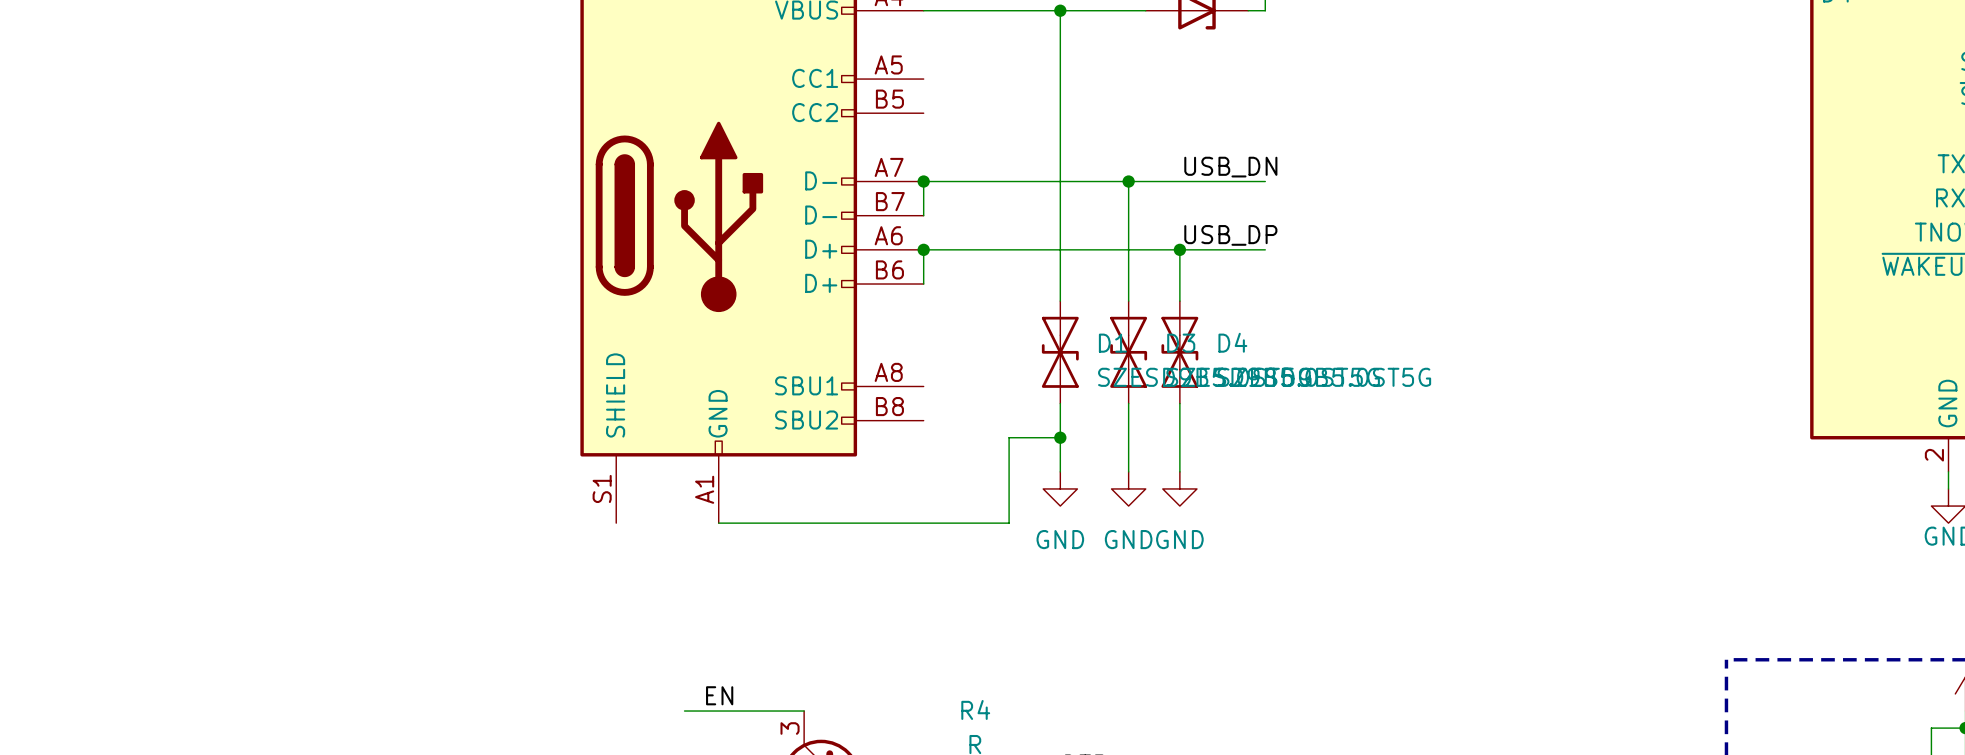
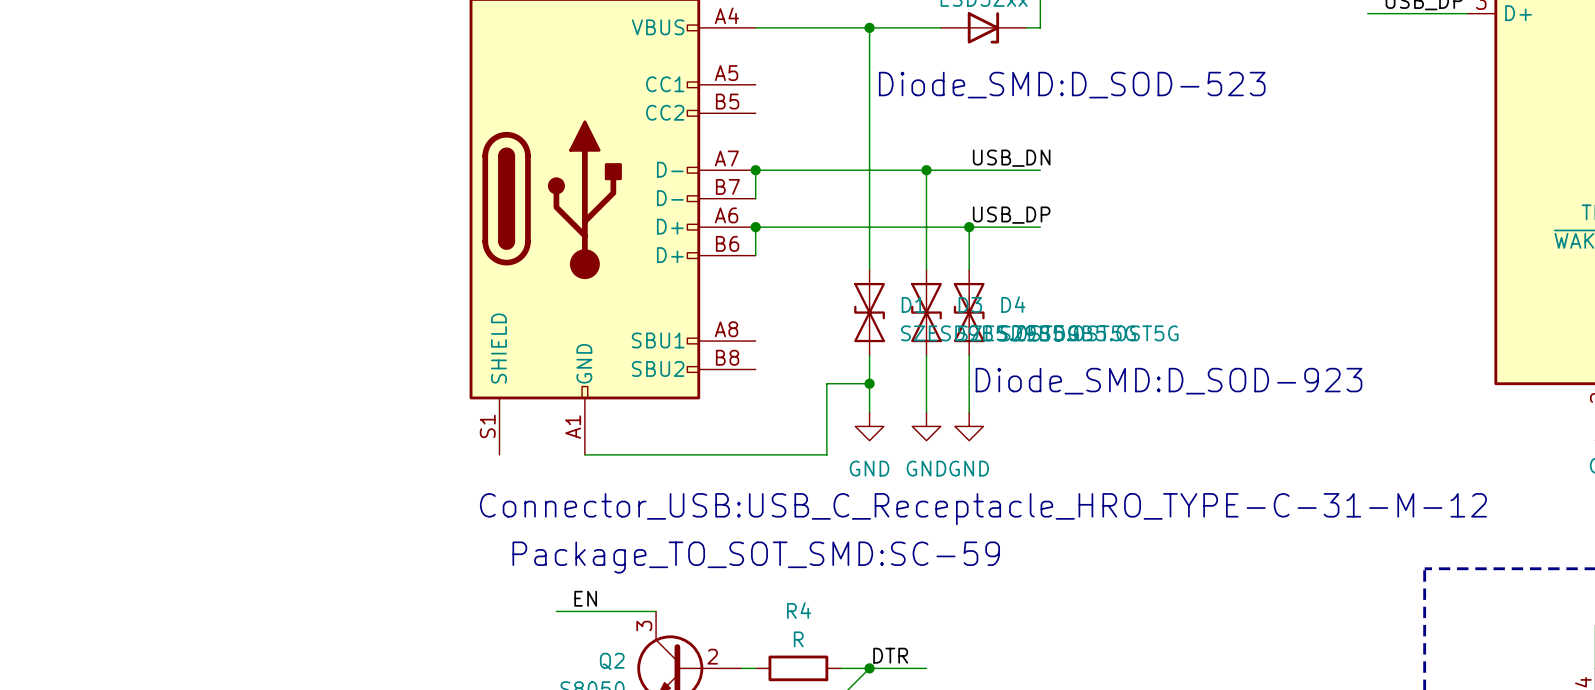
text: none -> Diode_SMD:D_SOD-523 (1072, 85)
text: none -> Diode_SMD:D_SOD-923 (1169, 381)
text: none -> Connector_USB:USB_C_Receptacle_HRO_TYPE-C-31-M-12 (983, 509)
text: none -> Package_TO_SOT_SMD:SC-59 (756, 557)

